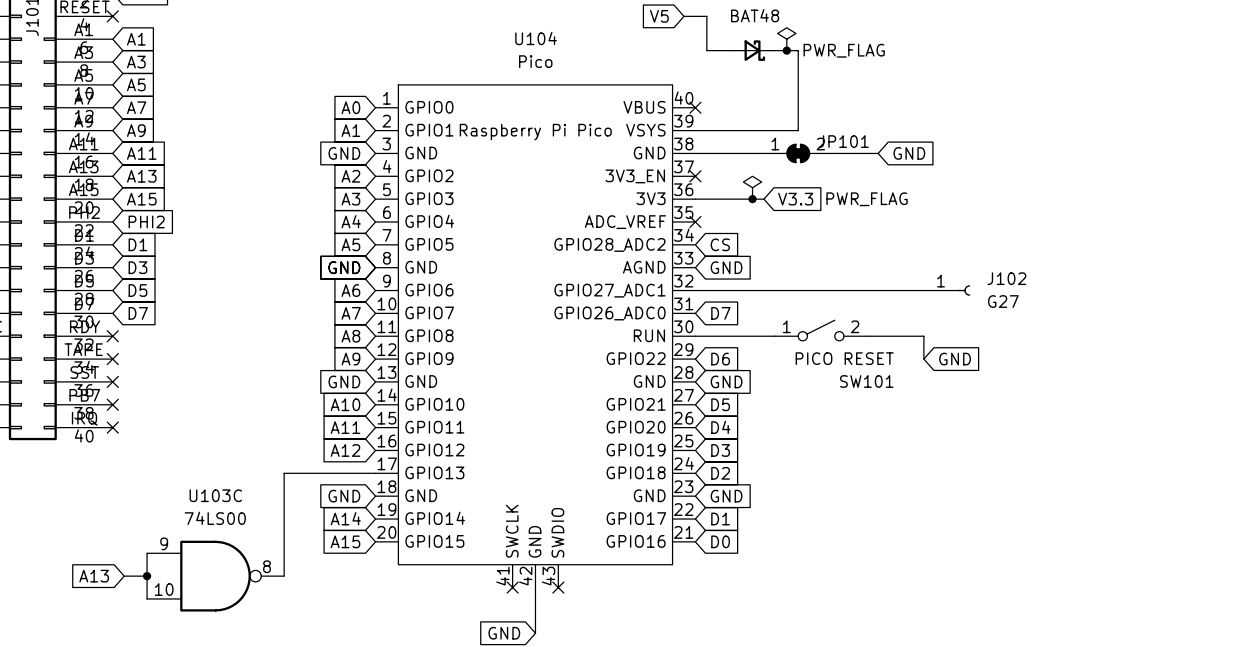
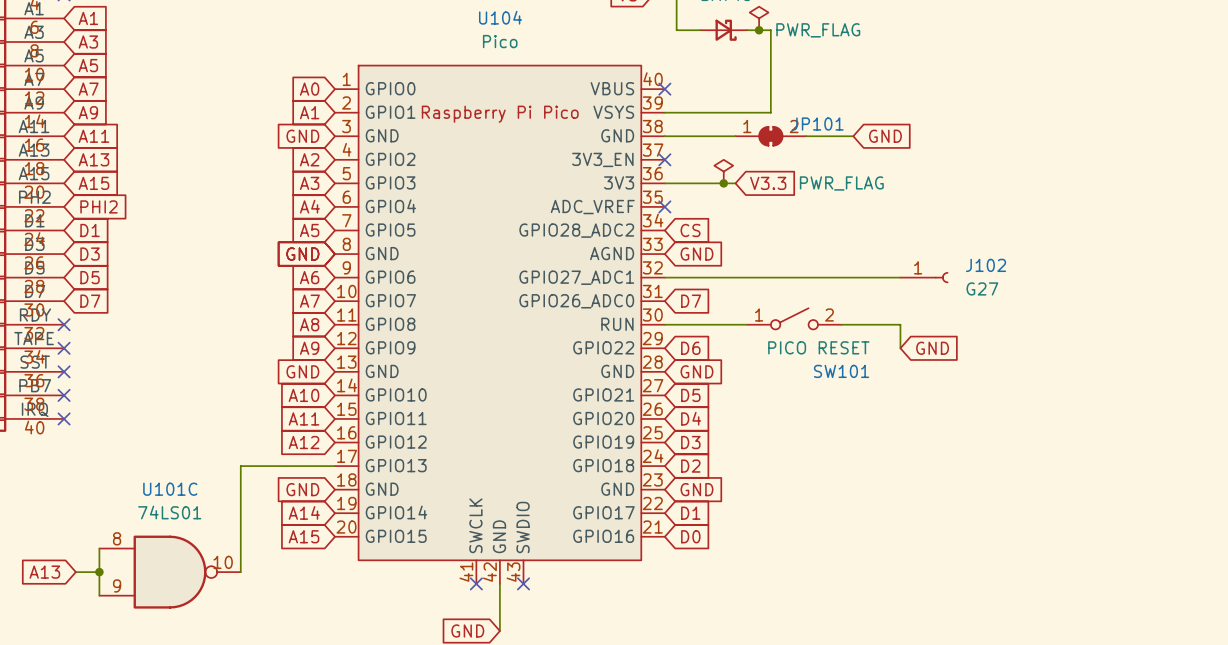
U103C name: U103C (215, 495) -> U101C (170, 489)
U103C value: 74LS00 (215, 518) -> 74LS01 (169, 512)
U103C pin number: 9 (164, 543) -> 8 (117, 538)
U103C pin number: 8 (267, 566) -> 10 (223, 562)
U103C pin number: 10 (164, 589) -> 9 (117, 585)

